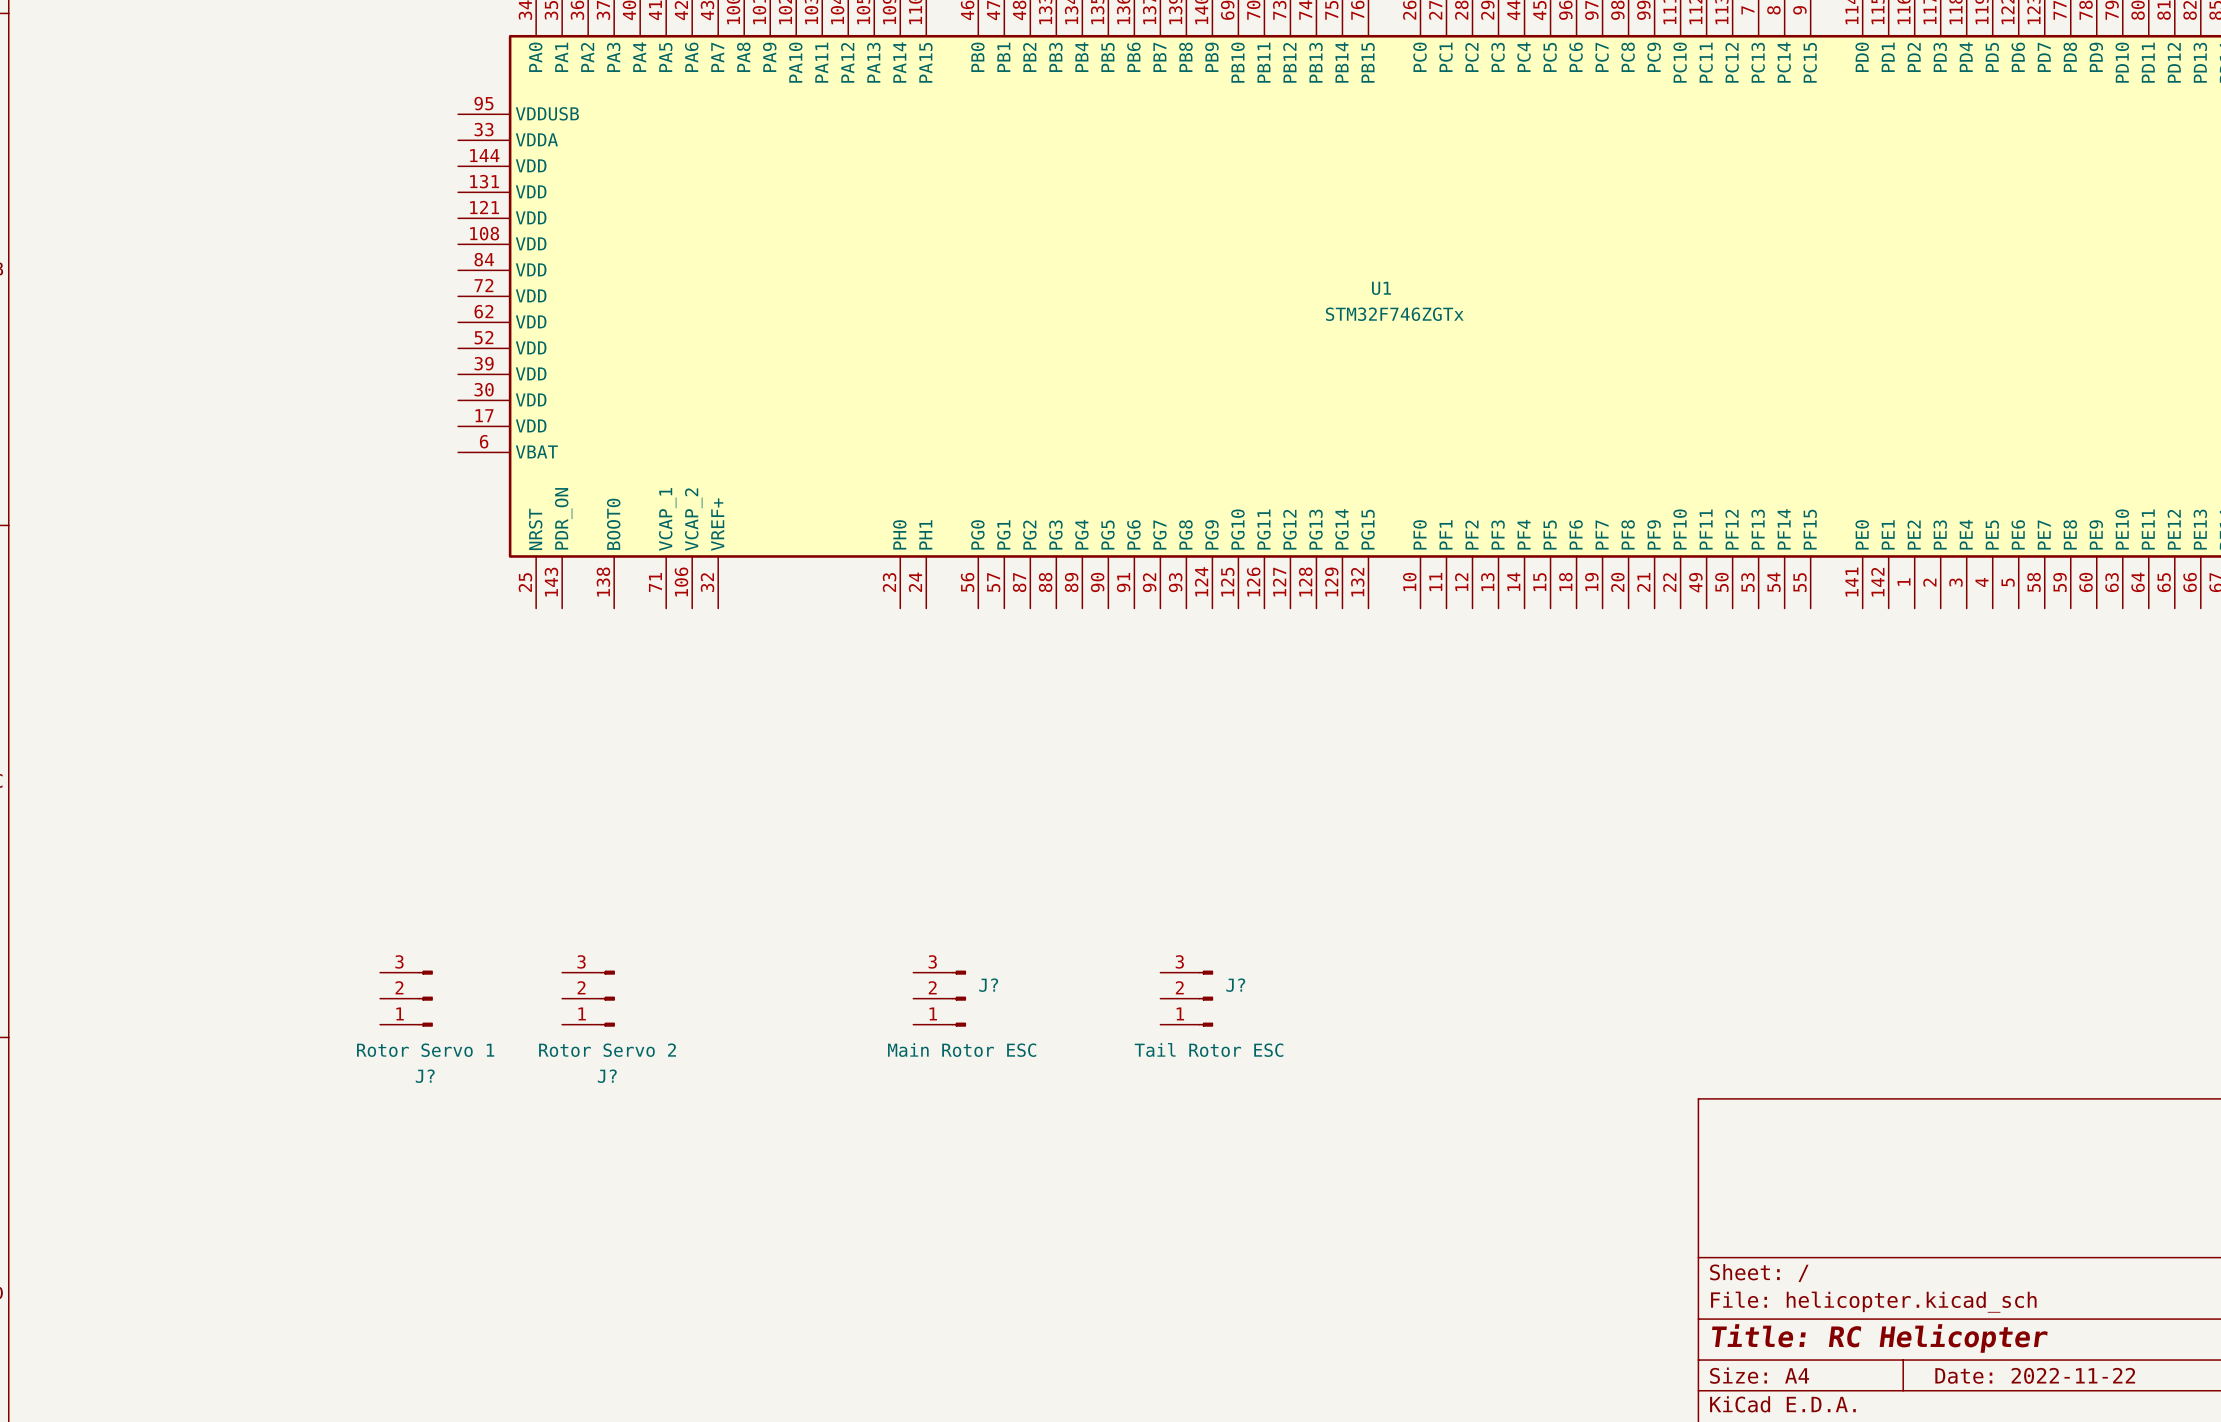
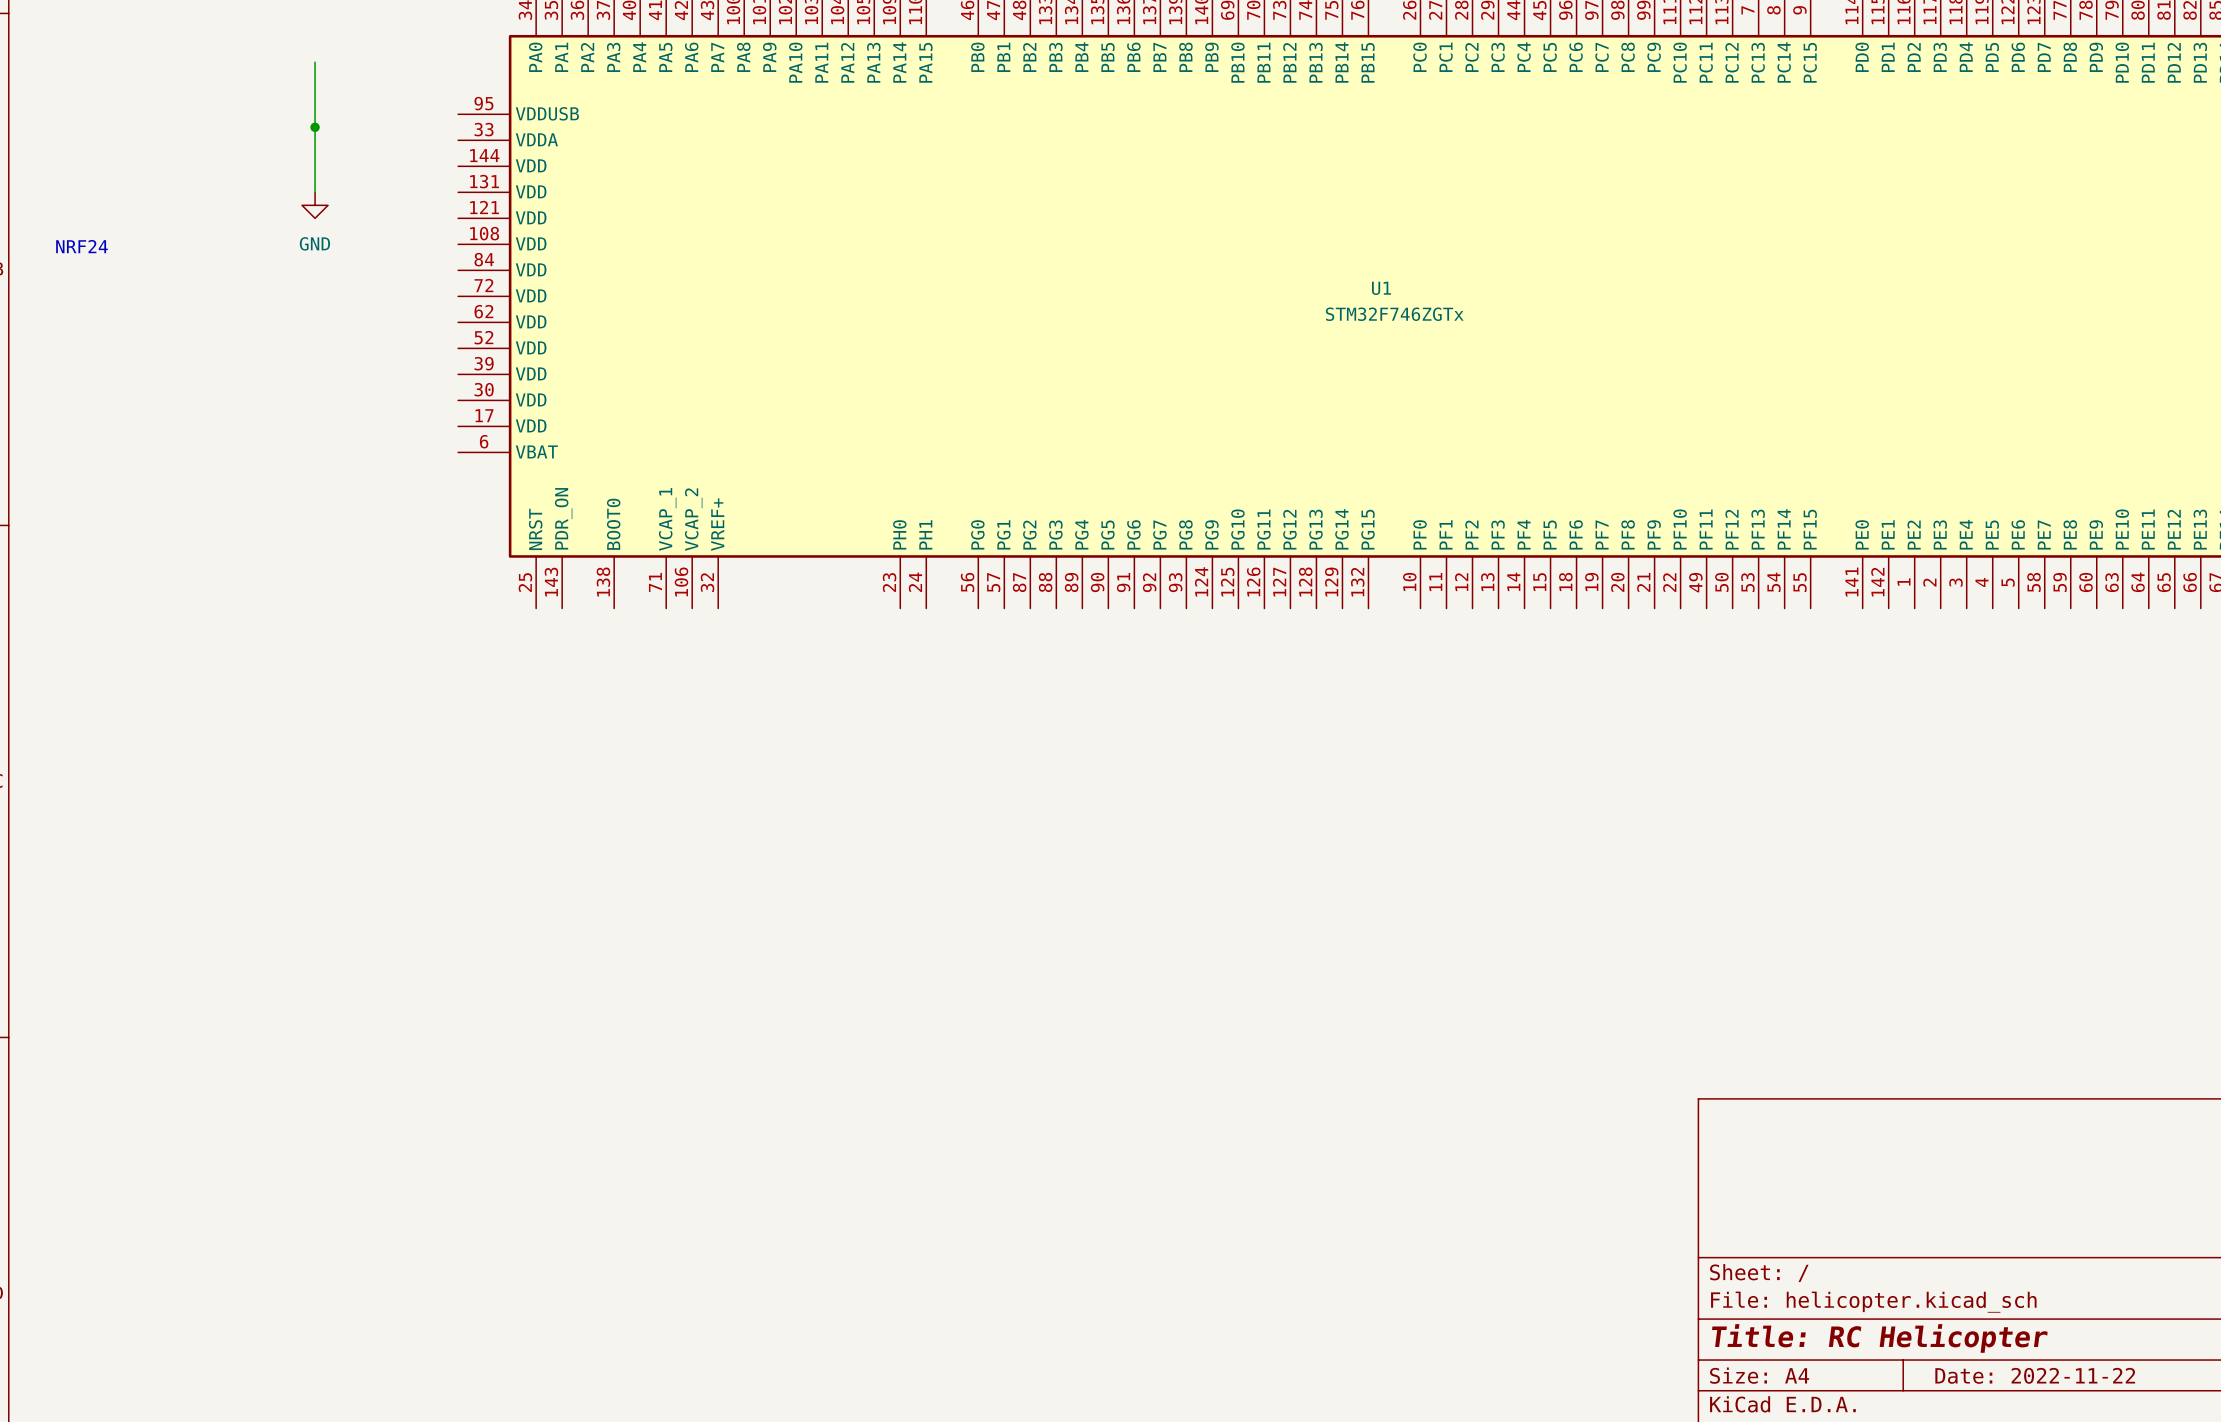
wire: none -> (315, 62) (315, 192)
junction: none -> (315, 127)
power symbol: none -> GND (315, 205)
text: none -> NRF24 (81, 246)
J?: Rotor Servo 1 (406, 998) -> none
J?: Rotor Servo 2 (588, 998) -> none
J?: Main Rotor ESC (939, 998) -> none
J?: Tail Rotor ESC (1186, 998) -> none

